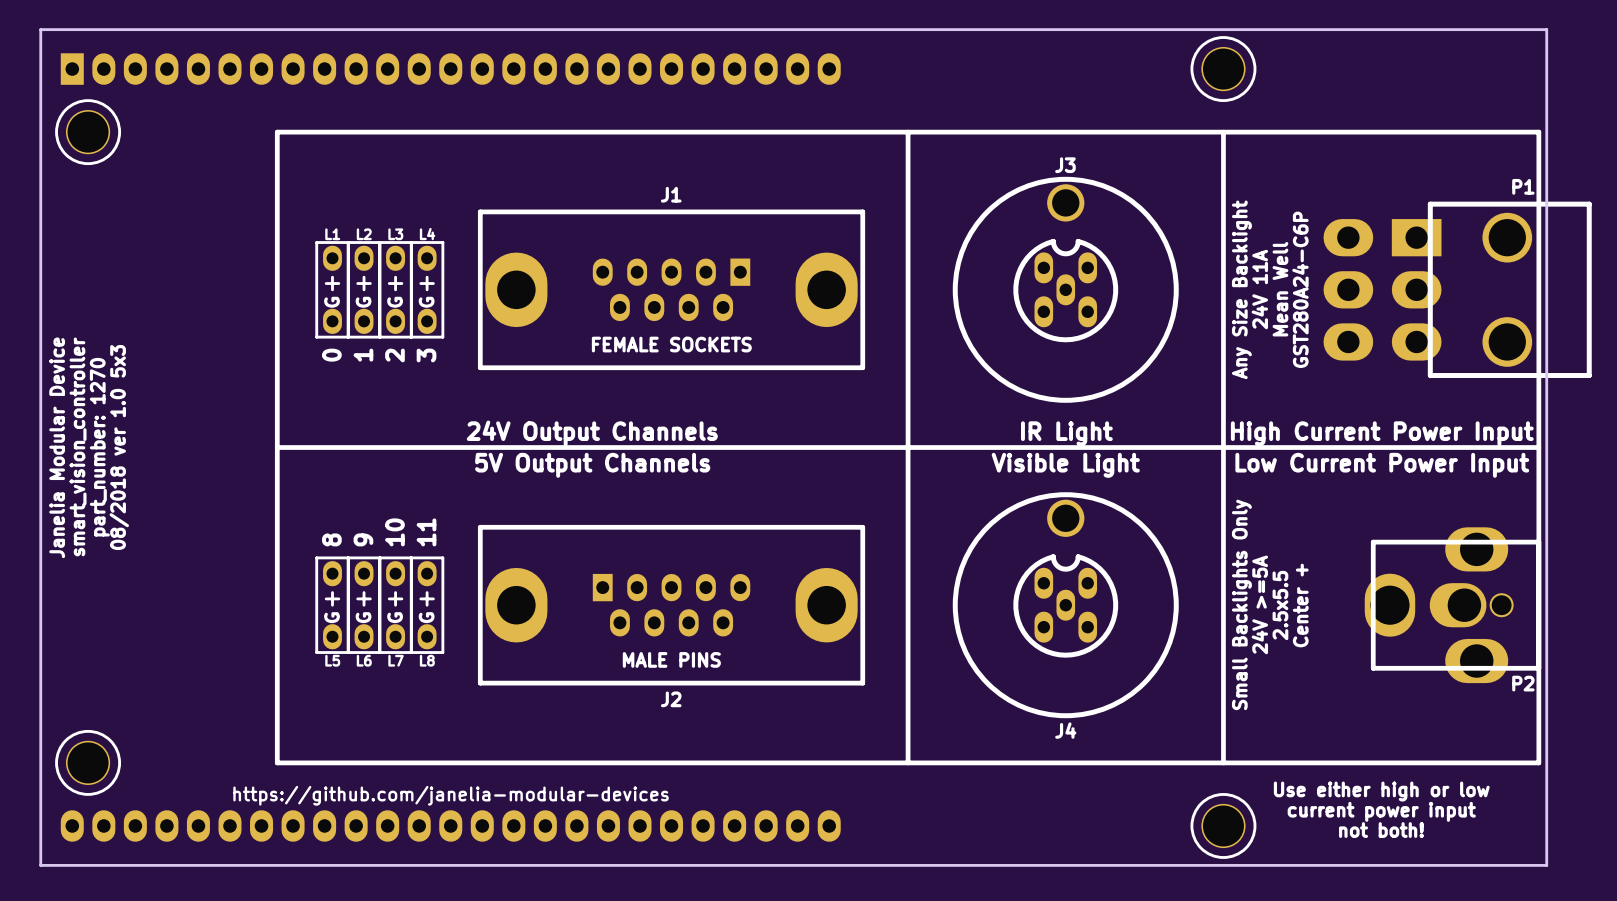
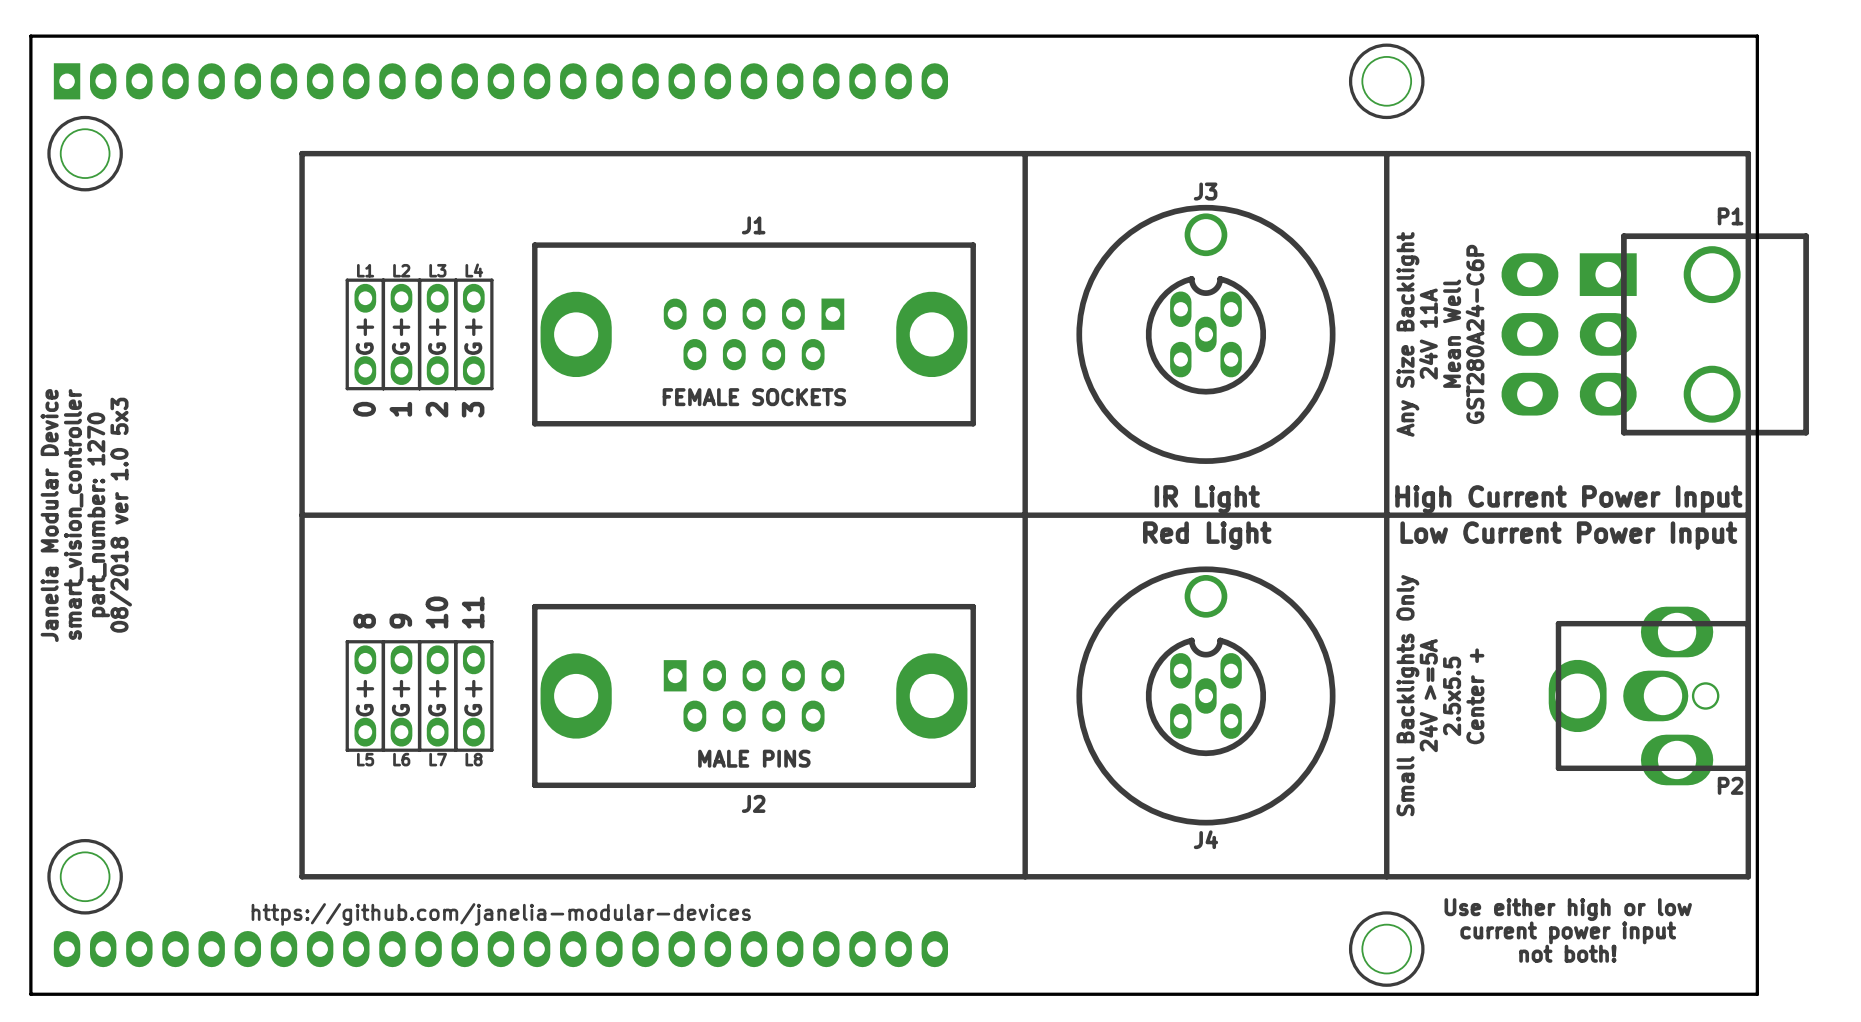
text: 24V Output Channels (592, 433) -> none
text: 5V Output Channels (592, 465) -> none
text: Visible Light (1065, 465) -> Red Light (1207, 535)

